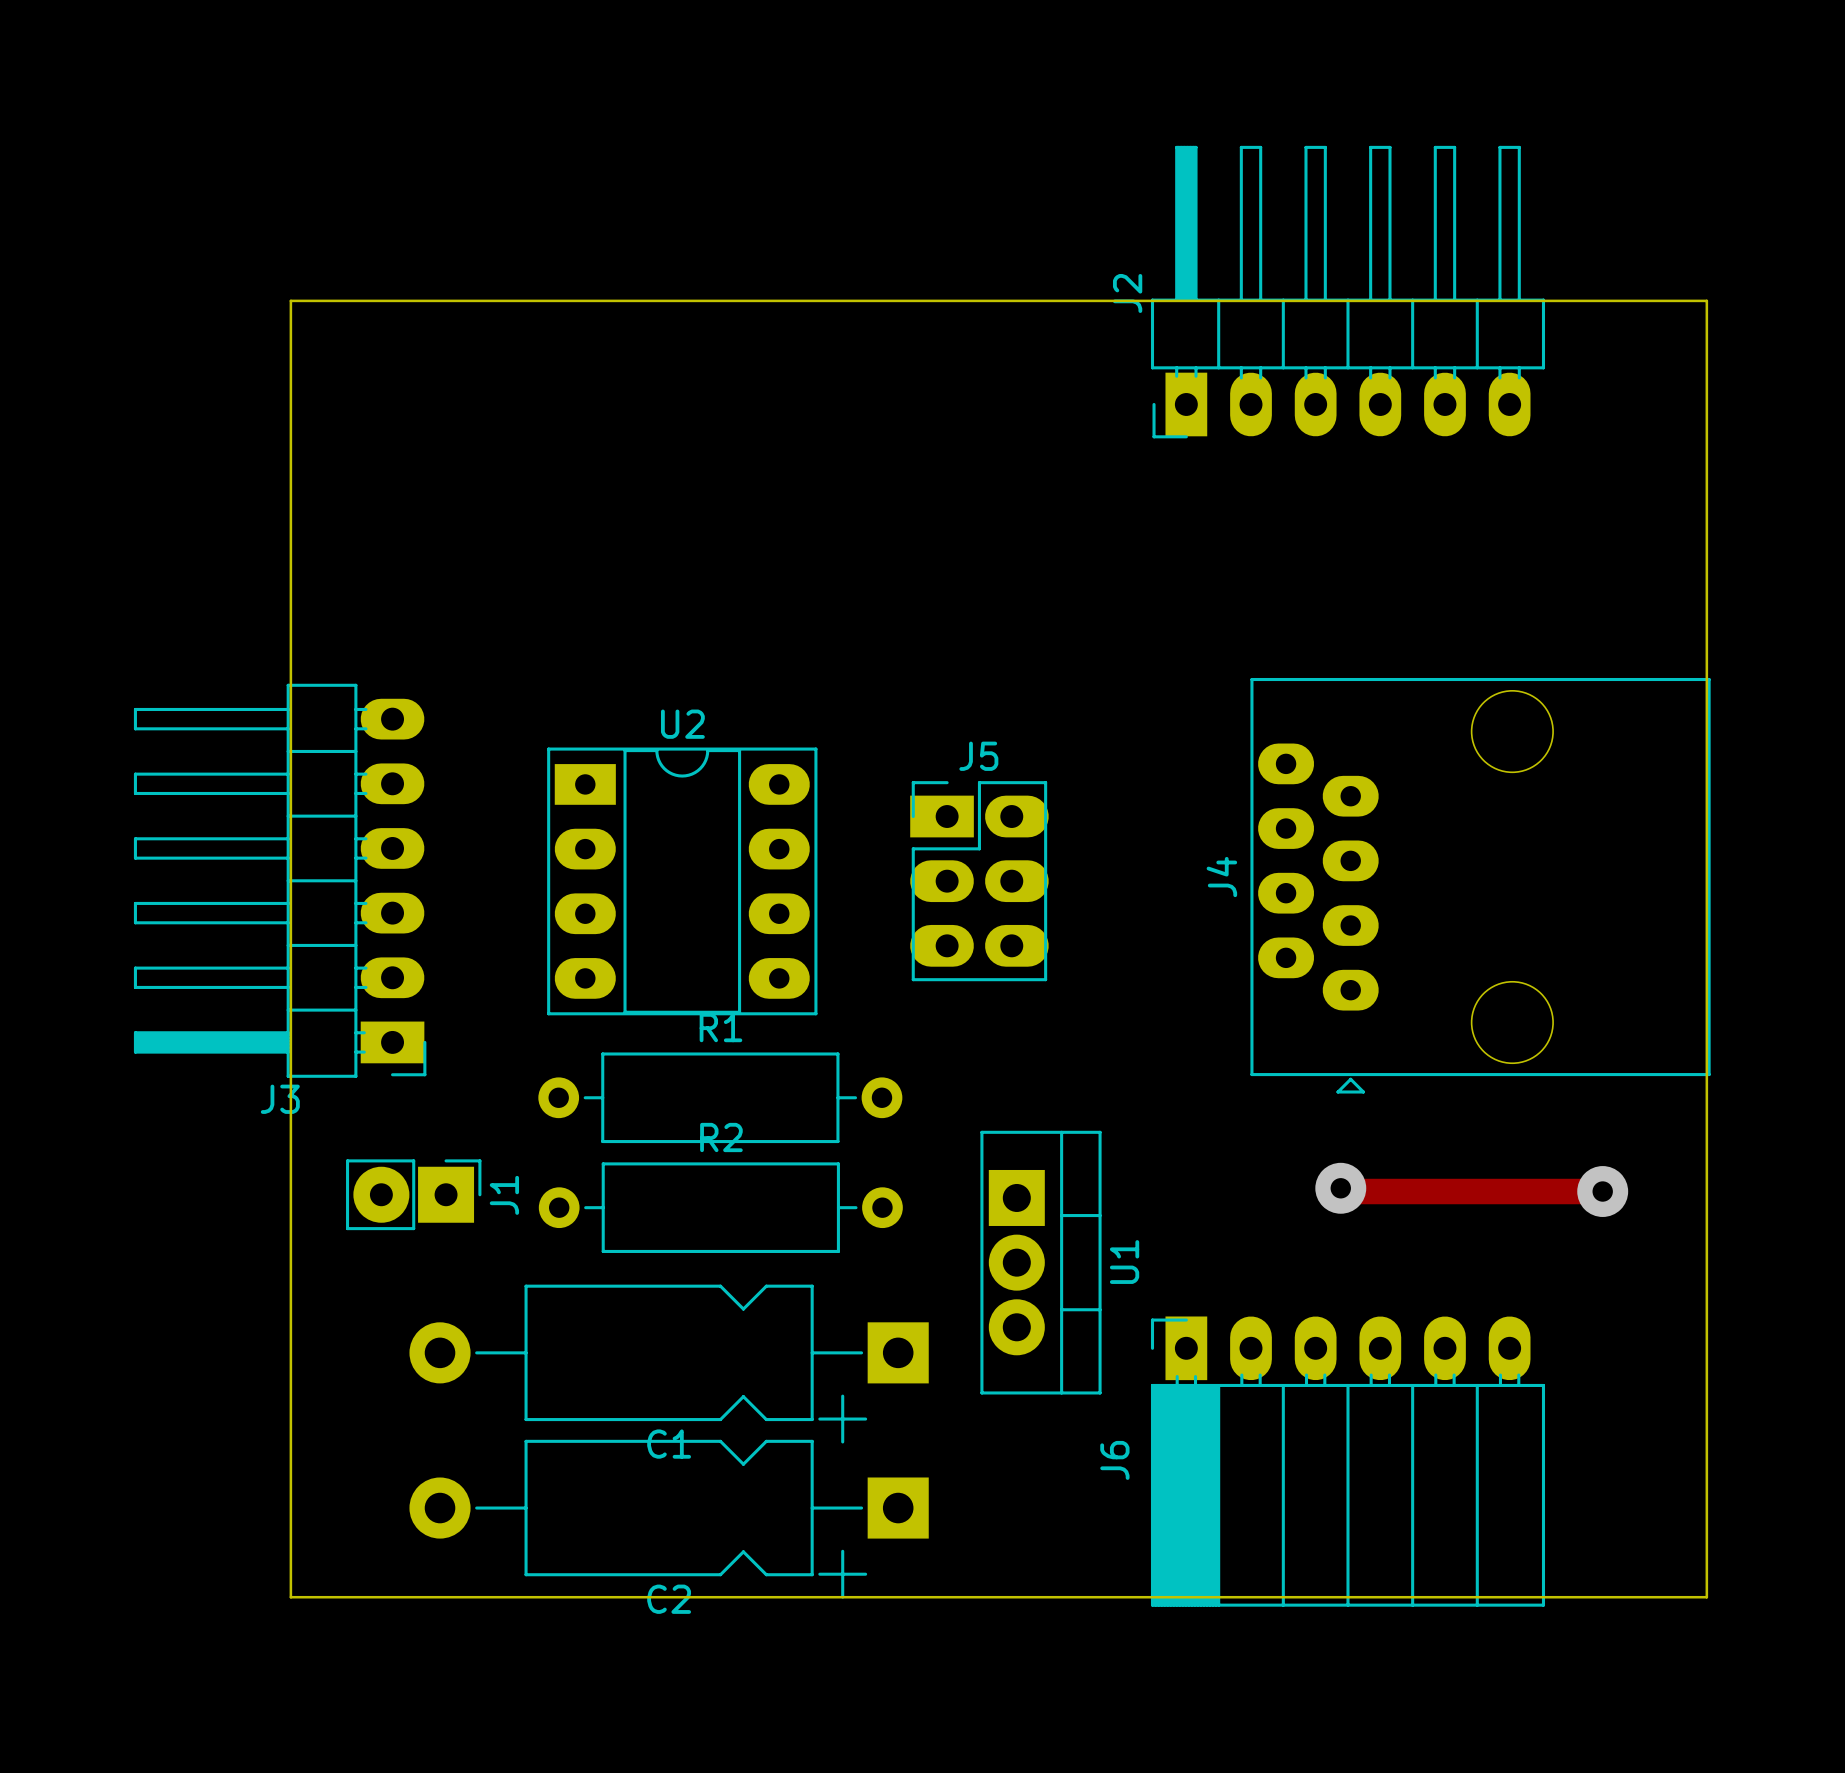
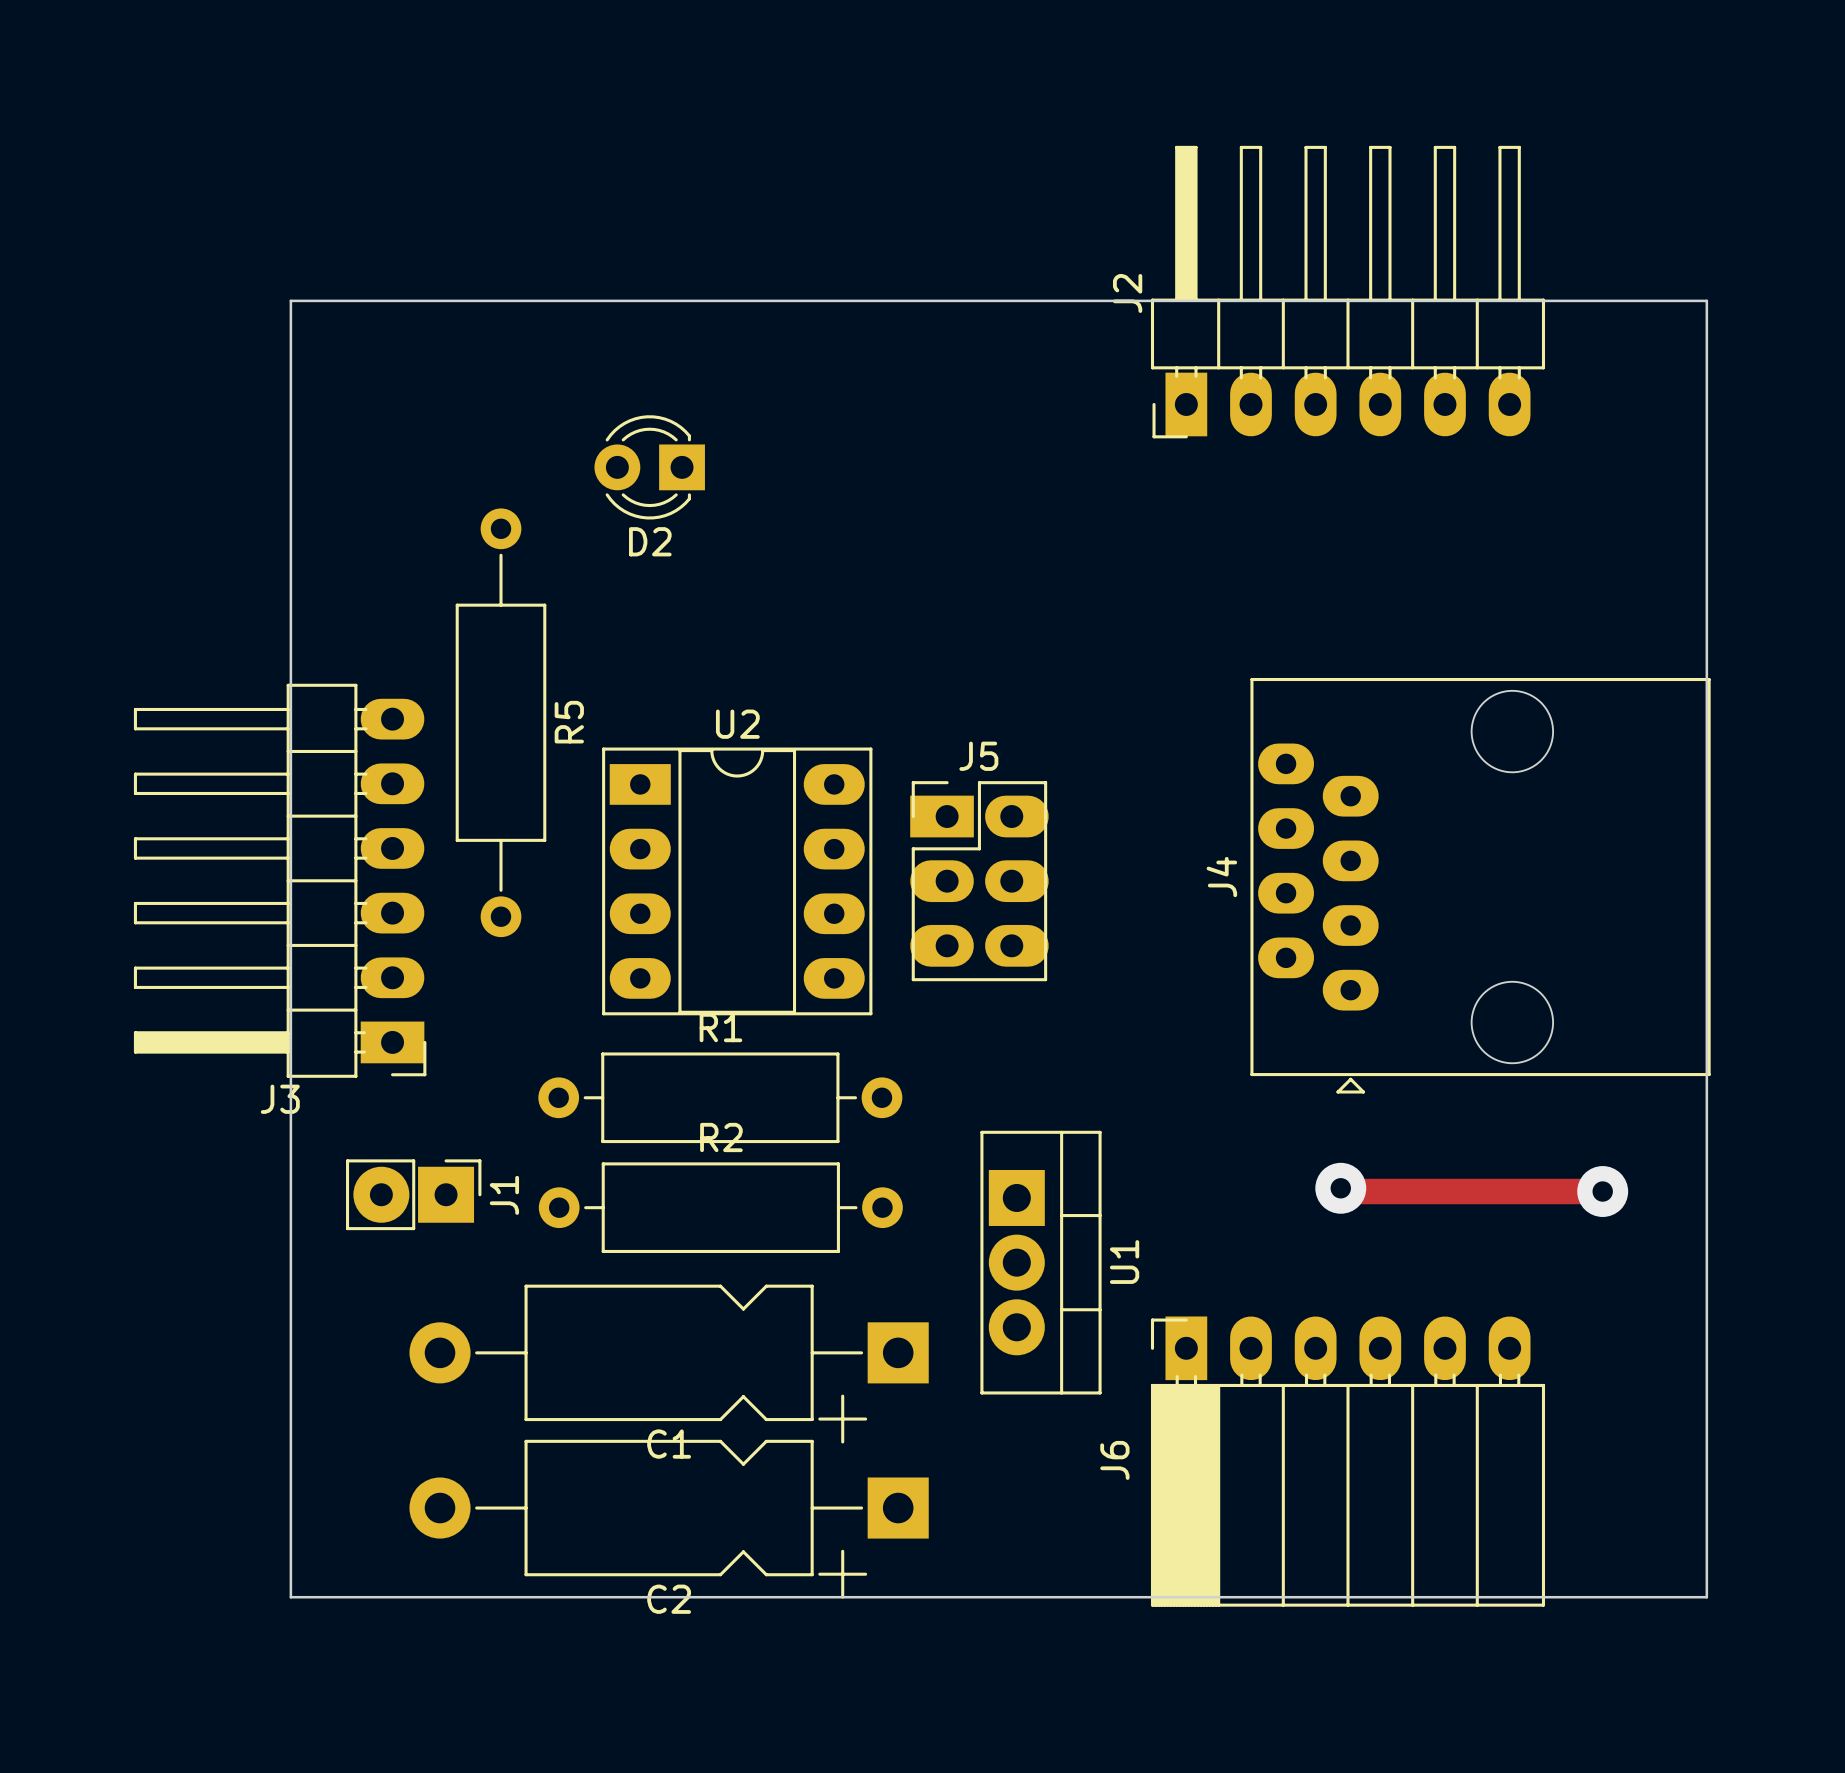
D2: none -> (649, 467)
R5: none -> (501, 722)
U2 position: (682, 881) -> (737, 881)

